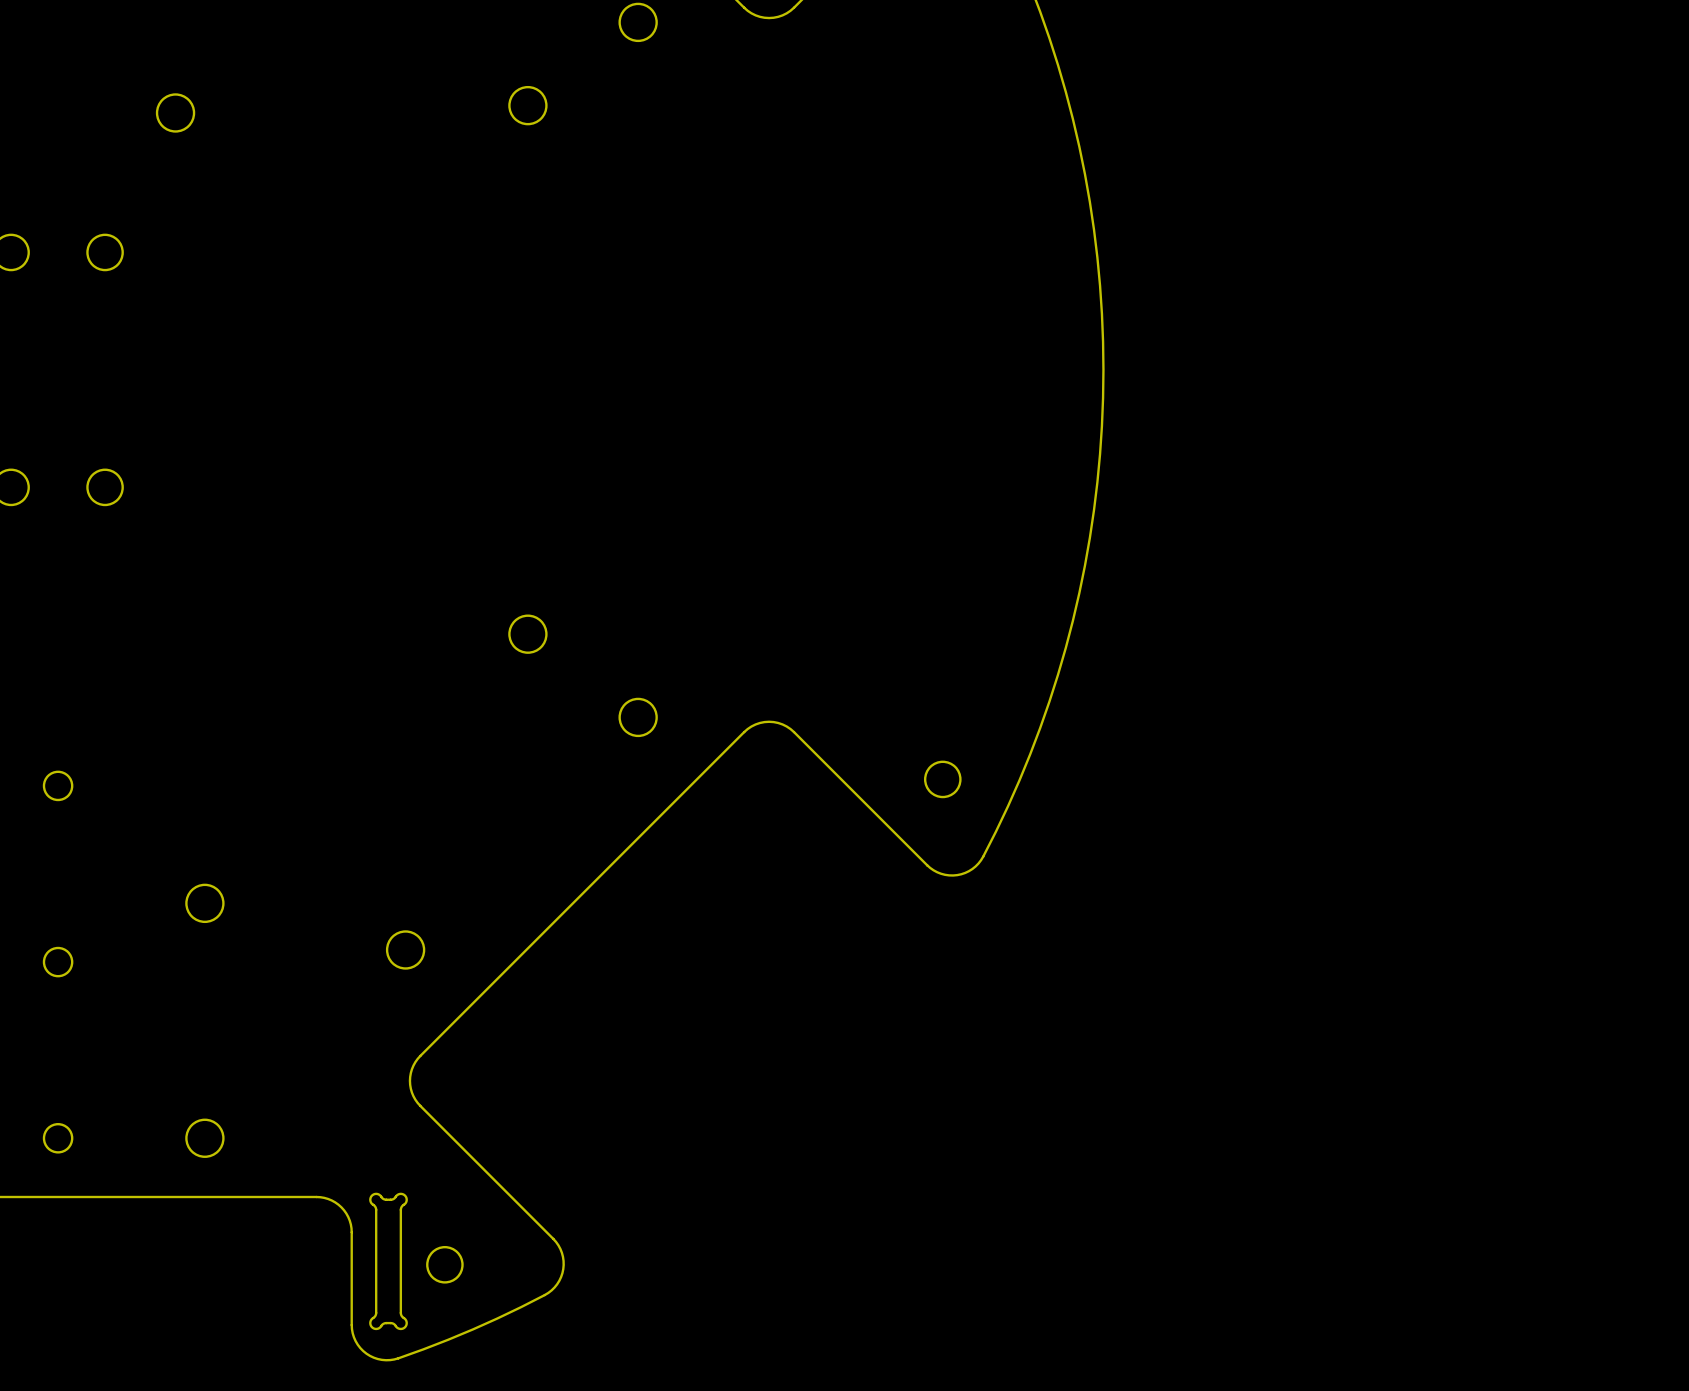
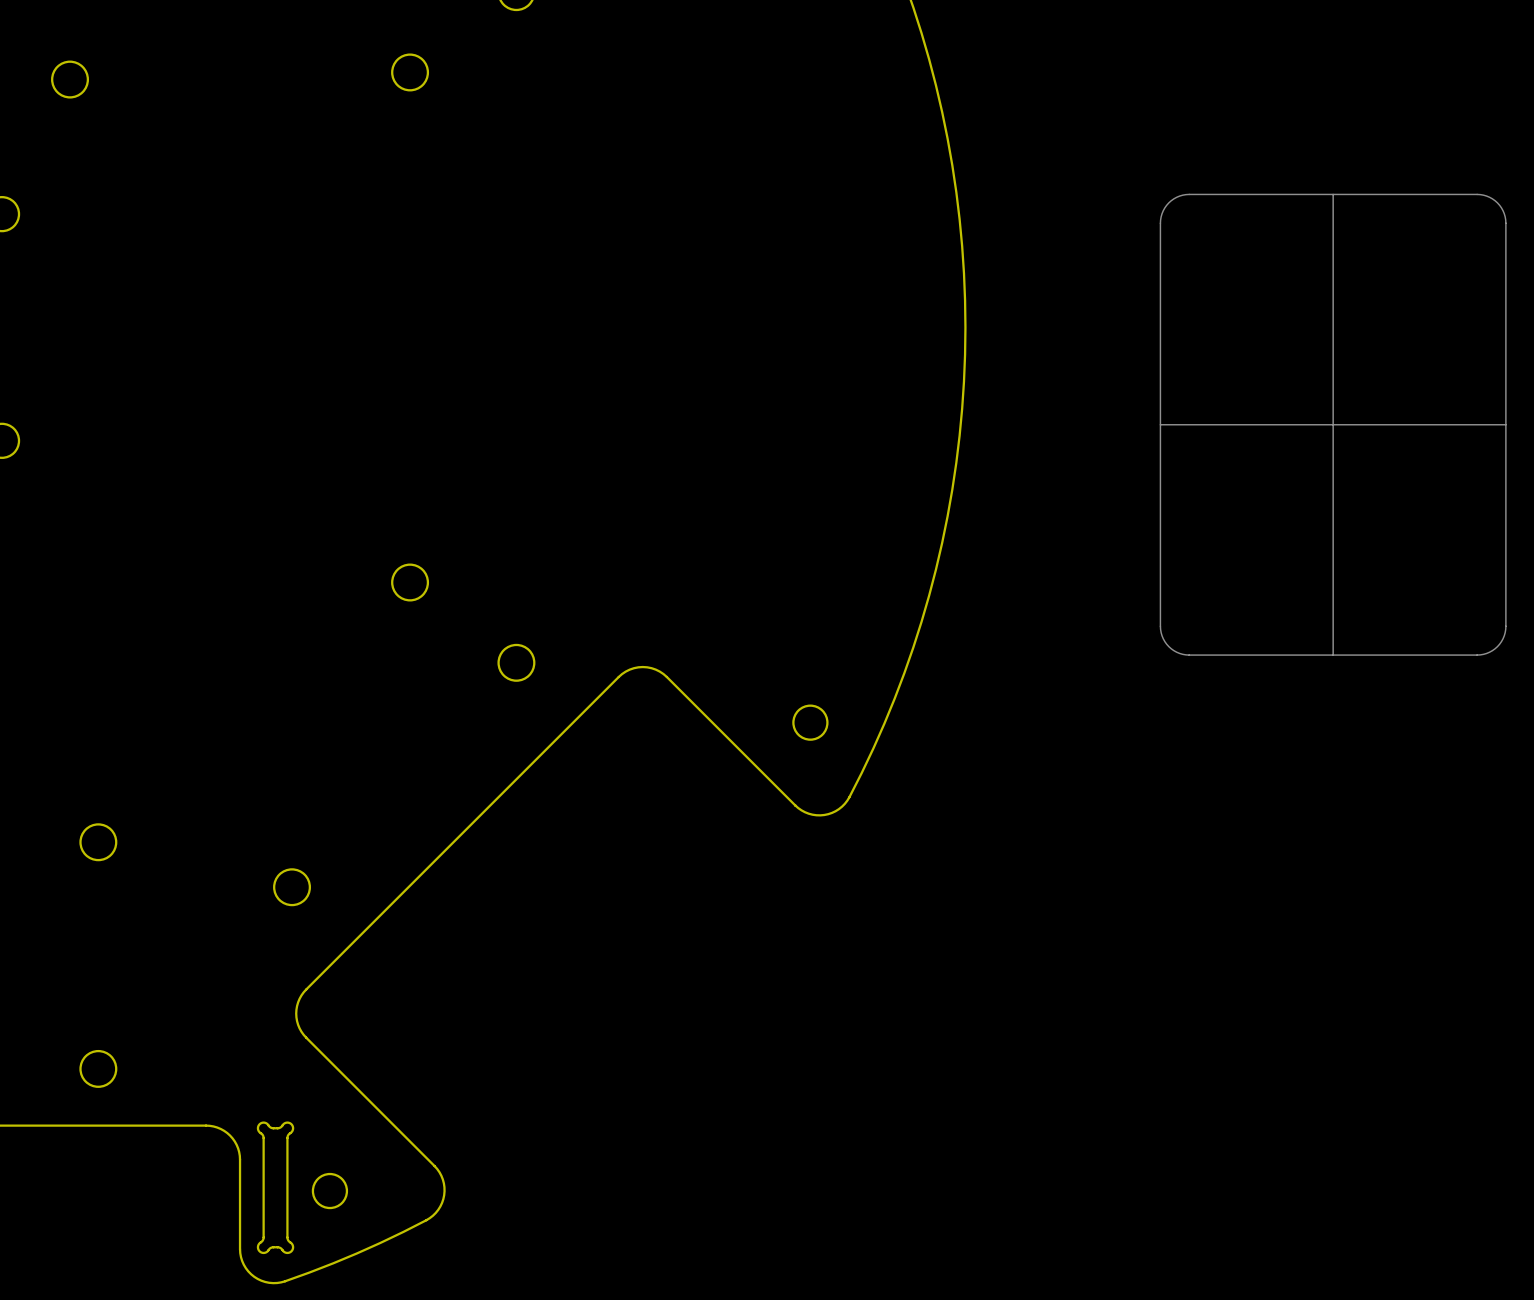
line: none -> (1189, 194) (1477, 194) (1489, 197) (1501, 207) (1505, 223) (1505, 626) (1503, 638) (1492, 650) (1477, 655) (1189, 655) (1173, 650) (1164, 641) (1160, 626) (1160, 223) (1162, 213) (1168, 202) (1176, 197) (1189, 194)
line: none -> (1333, 194) (1333, 655)
line: none -> (1160, 424) (1505, 424)

